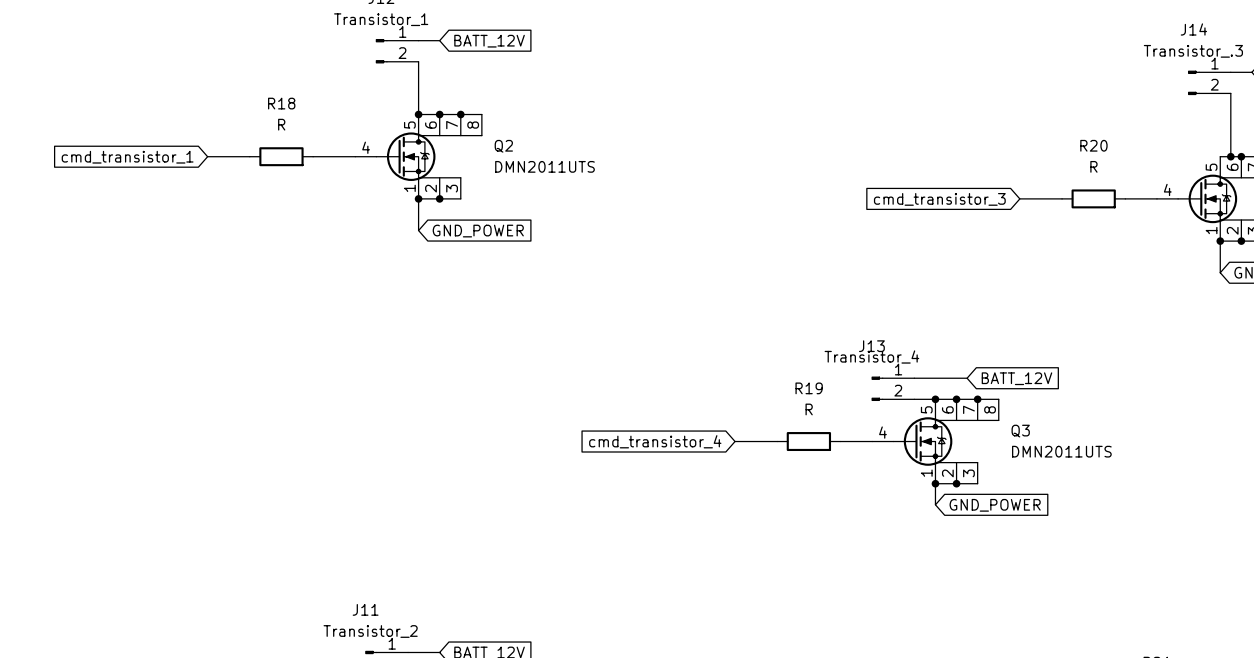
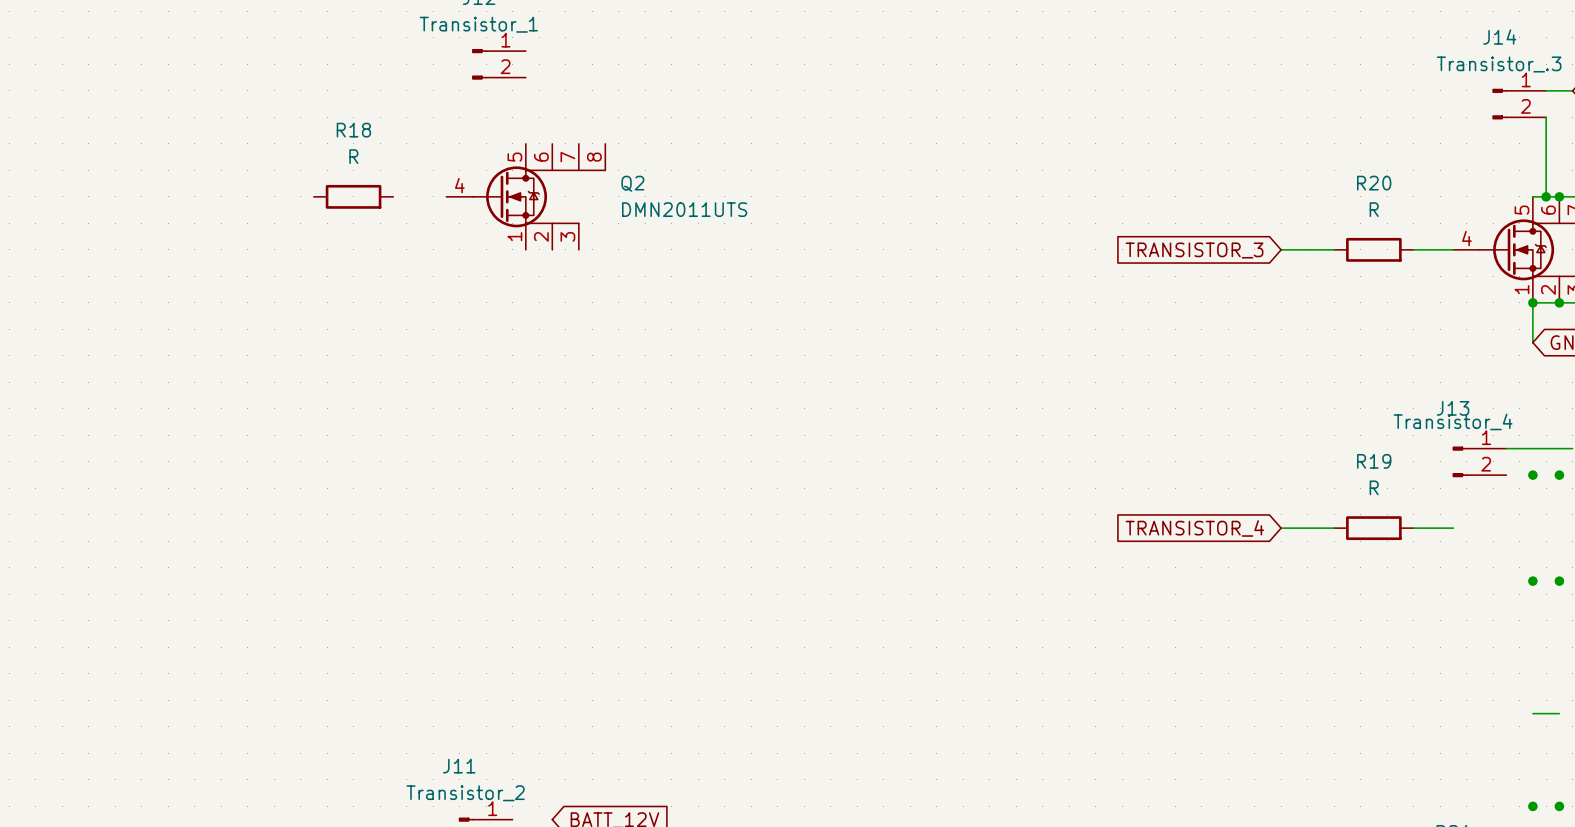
wire: (418, 40) (439, 40) -> none
global label: BATT_12V (489, 41) -> none
wire: (418, 61) (418, 114) (481, 114) -> none
junction: (418, 114) -> none
junction: (439, 114) -> none
junction: (460, 114) -> none
wire: (207, 156) (249, 156) -> none
wire: (313, 156) (355, 156) -> none
global label: cmd_transistor_1 (127, 157) -> none
junction: (418, 198) -> none
junction: (439, 198) -> none
wire: (460, 198) (418, 198) (418, 230) -> none
global label: cmd_transistor_3 (939, 199) -> TRANSISTOR_3 (1194, 250)
global label: GND_POWER (478, 231) -> none
wire: none -> (1506, 448) (1572, 448)
wire: (914, 378) (967, 378) -> none
global label: BATT_12V (1016, 378) -> none
junction: none -> (1532, 475)
junction: none -> (1559, 475)
J13 position: (892, 388) -> (1479, 461)
wire: (914, 399) (998, 399) -> none
junction: (935, 399) -> none
junction: (956, 399) -> none
junction: (977, 399) -> none
global label: none -> TRANSISTOR_4 (1194, 528)
wire: none -> (1281, 528) (1334, 528)
wire: none -> (1413, 528) (1453, 528)
global label: cmd_transistor_4 (655, 441) -> none
wire: (735, 441) (777, 441) -> none
R19 position: (808, 441) -> (1373, 528)
wire: (840, 441) (872, 441) -> none
Q3: DMN2011UTS (935, 441) -> none
junction: none -> (1532, 581)
junction: none -> (1559, 581)
junction: (935, 483) -> none
junction: (956, 483) -> none
wire: (977, 483) (935, 483) (935, 504) -> none
global label: GND_POWER (995, 505) -> none
wire: none -> (1532, 713) (1559, 713)
junction: none -> (1532, 806)
junction: none -> (1559, 806)
wire: (408, 652) (439, 652) -> none

